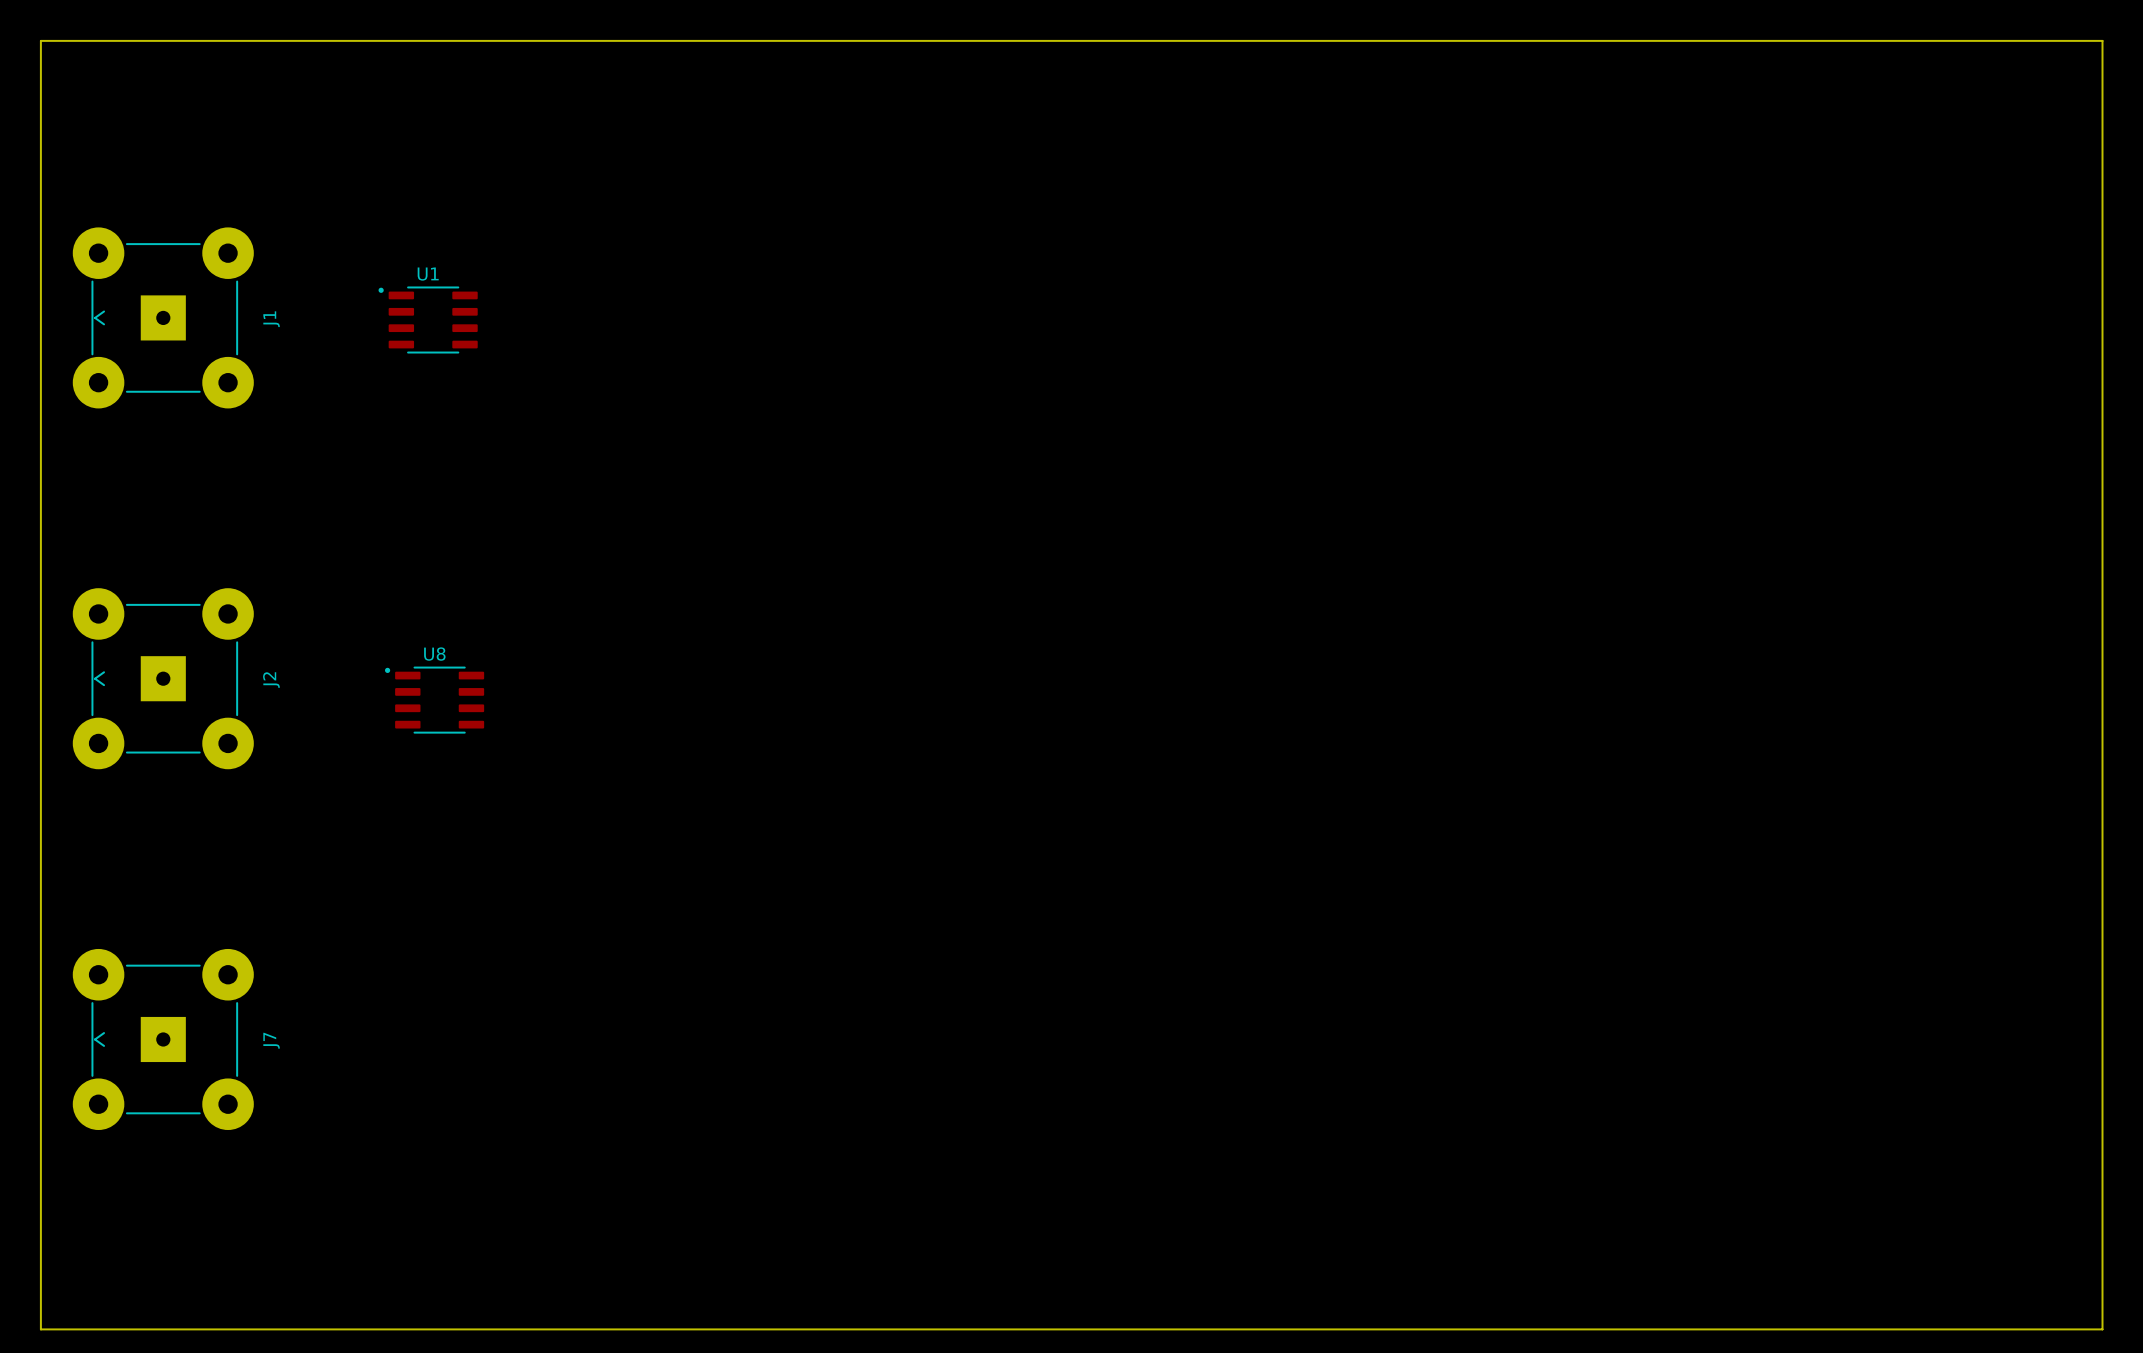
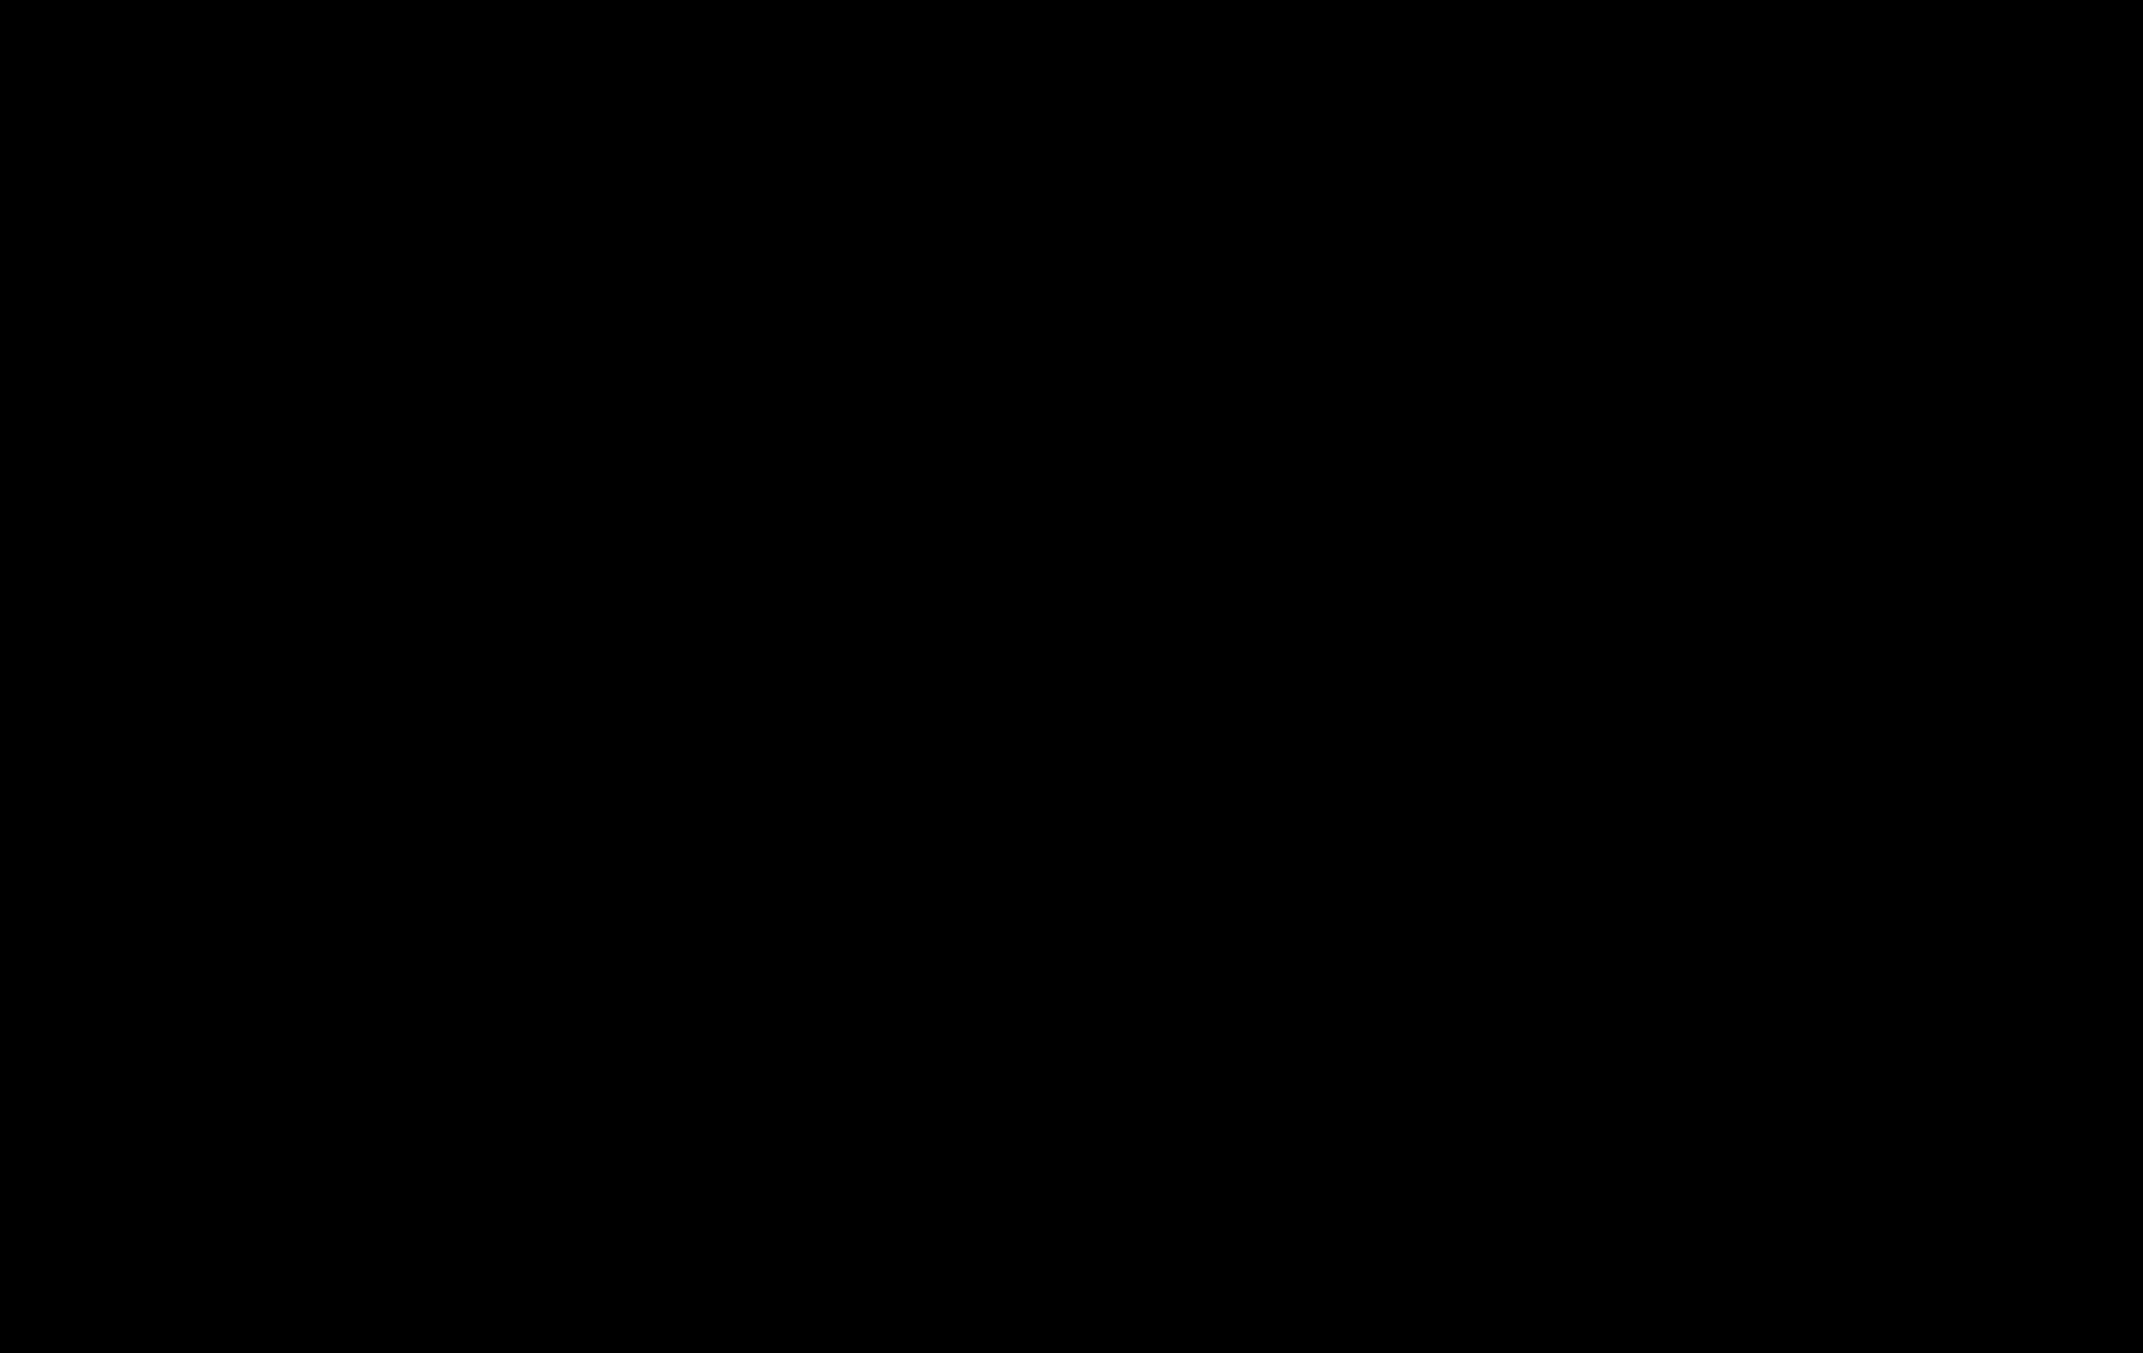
board edge: (40, 40) (2102, 40) (2102, 1329) (40, 1329) (40, 40) -> none
J1: (163, 317) -> none
U1: (428, 319) -> none
J2: (163, 678) -> none
U8: (434, 700) -> none
J7: (163, 1039) -> none

